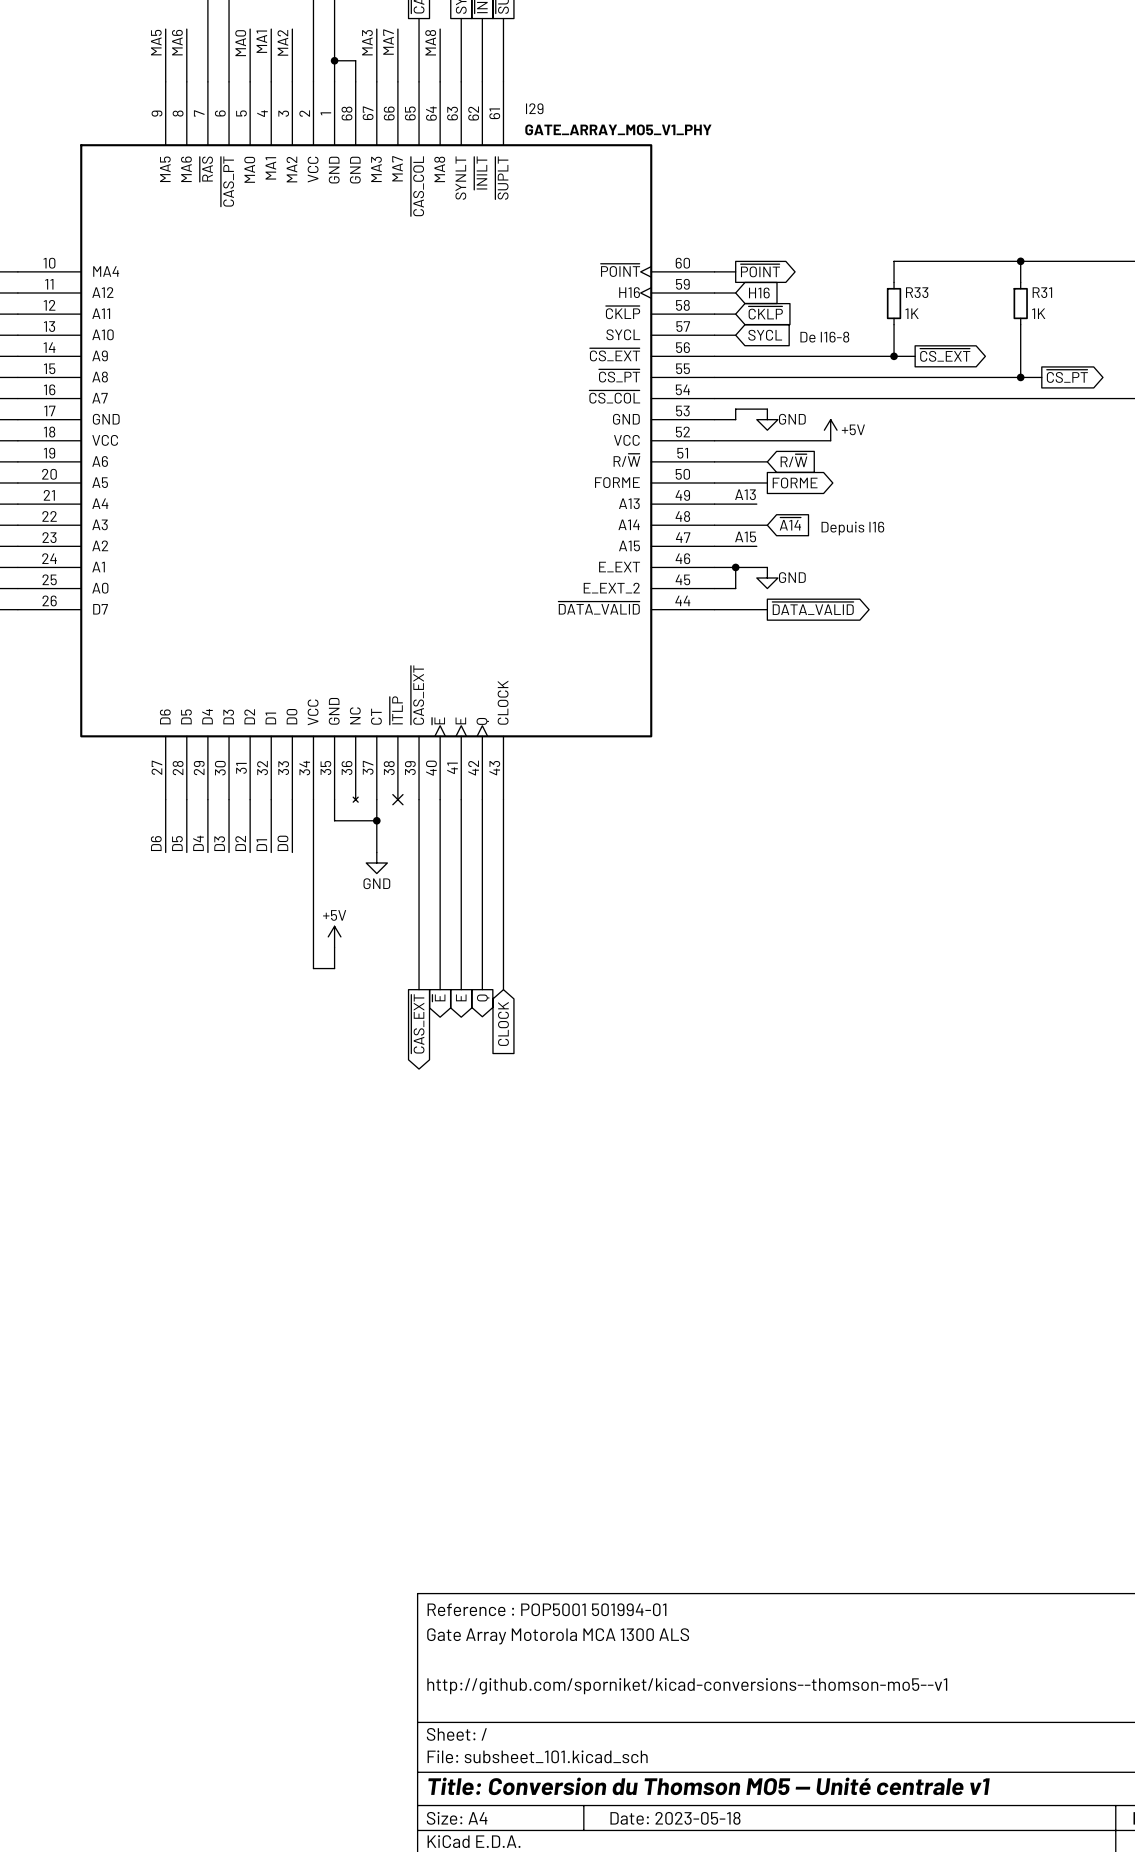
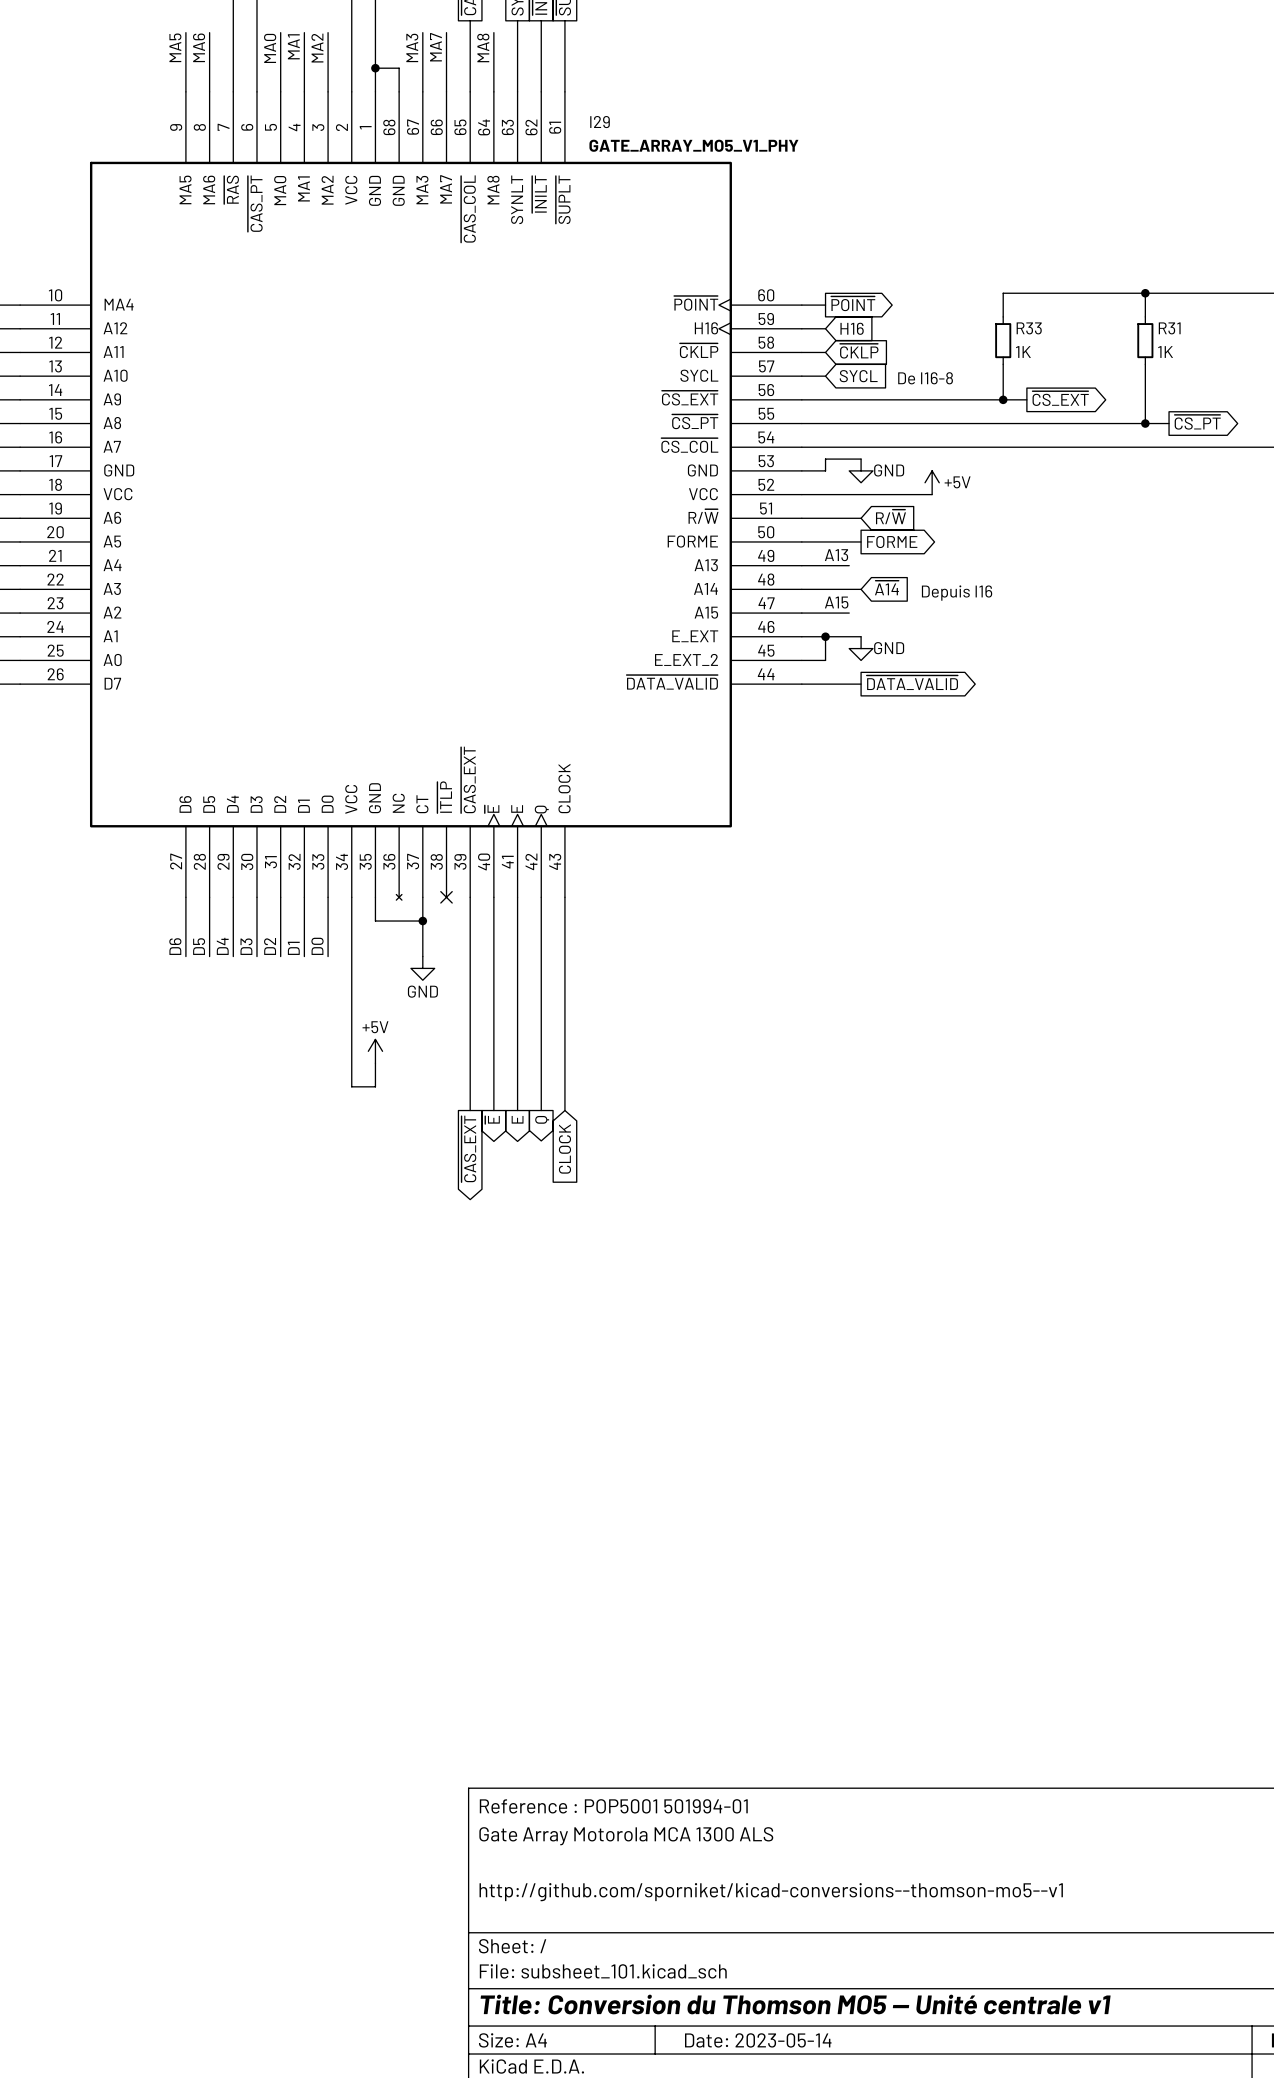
title block: Date: 2023-05-18 (675, 1818) -> Date: 2023-05-14 (758, 2040)

